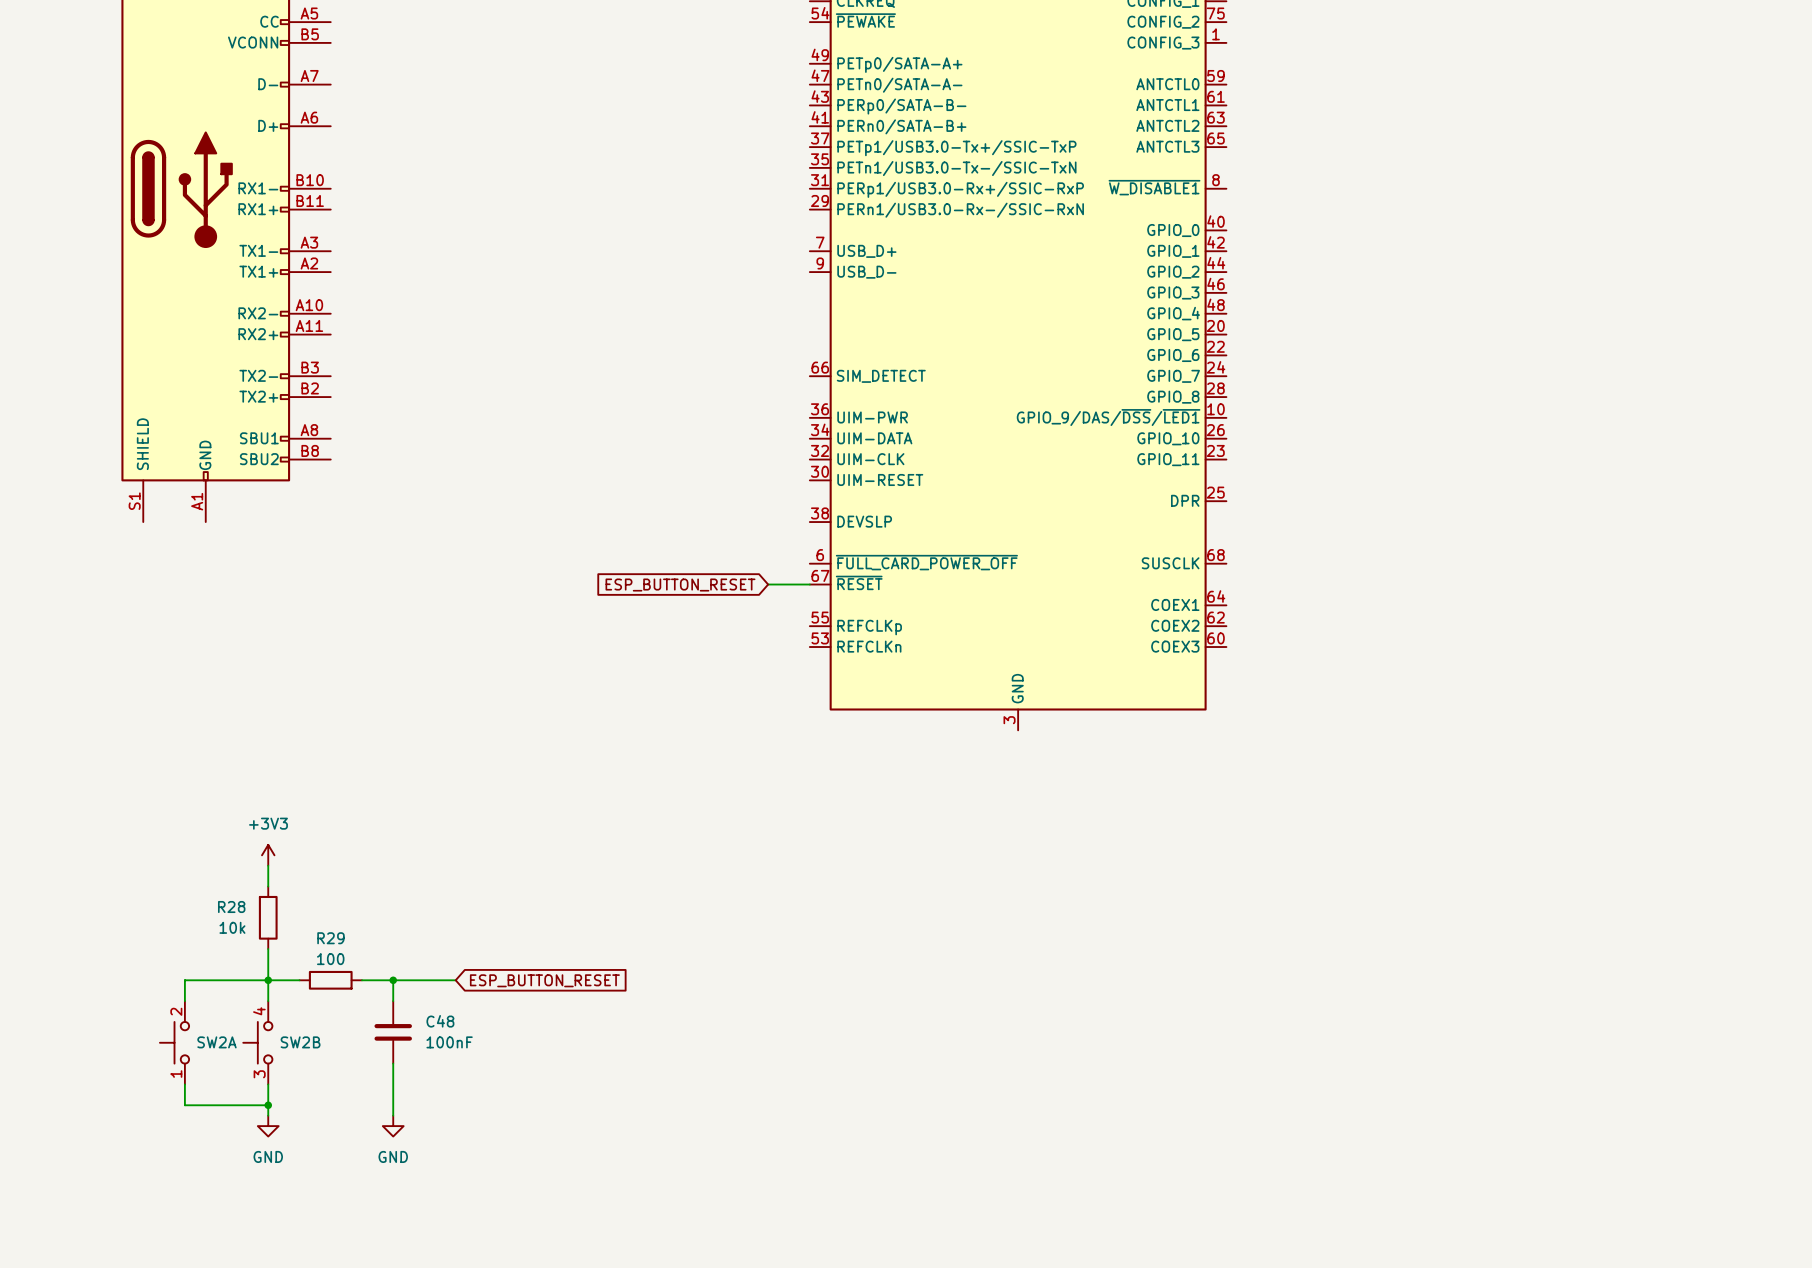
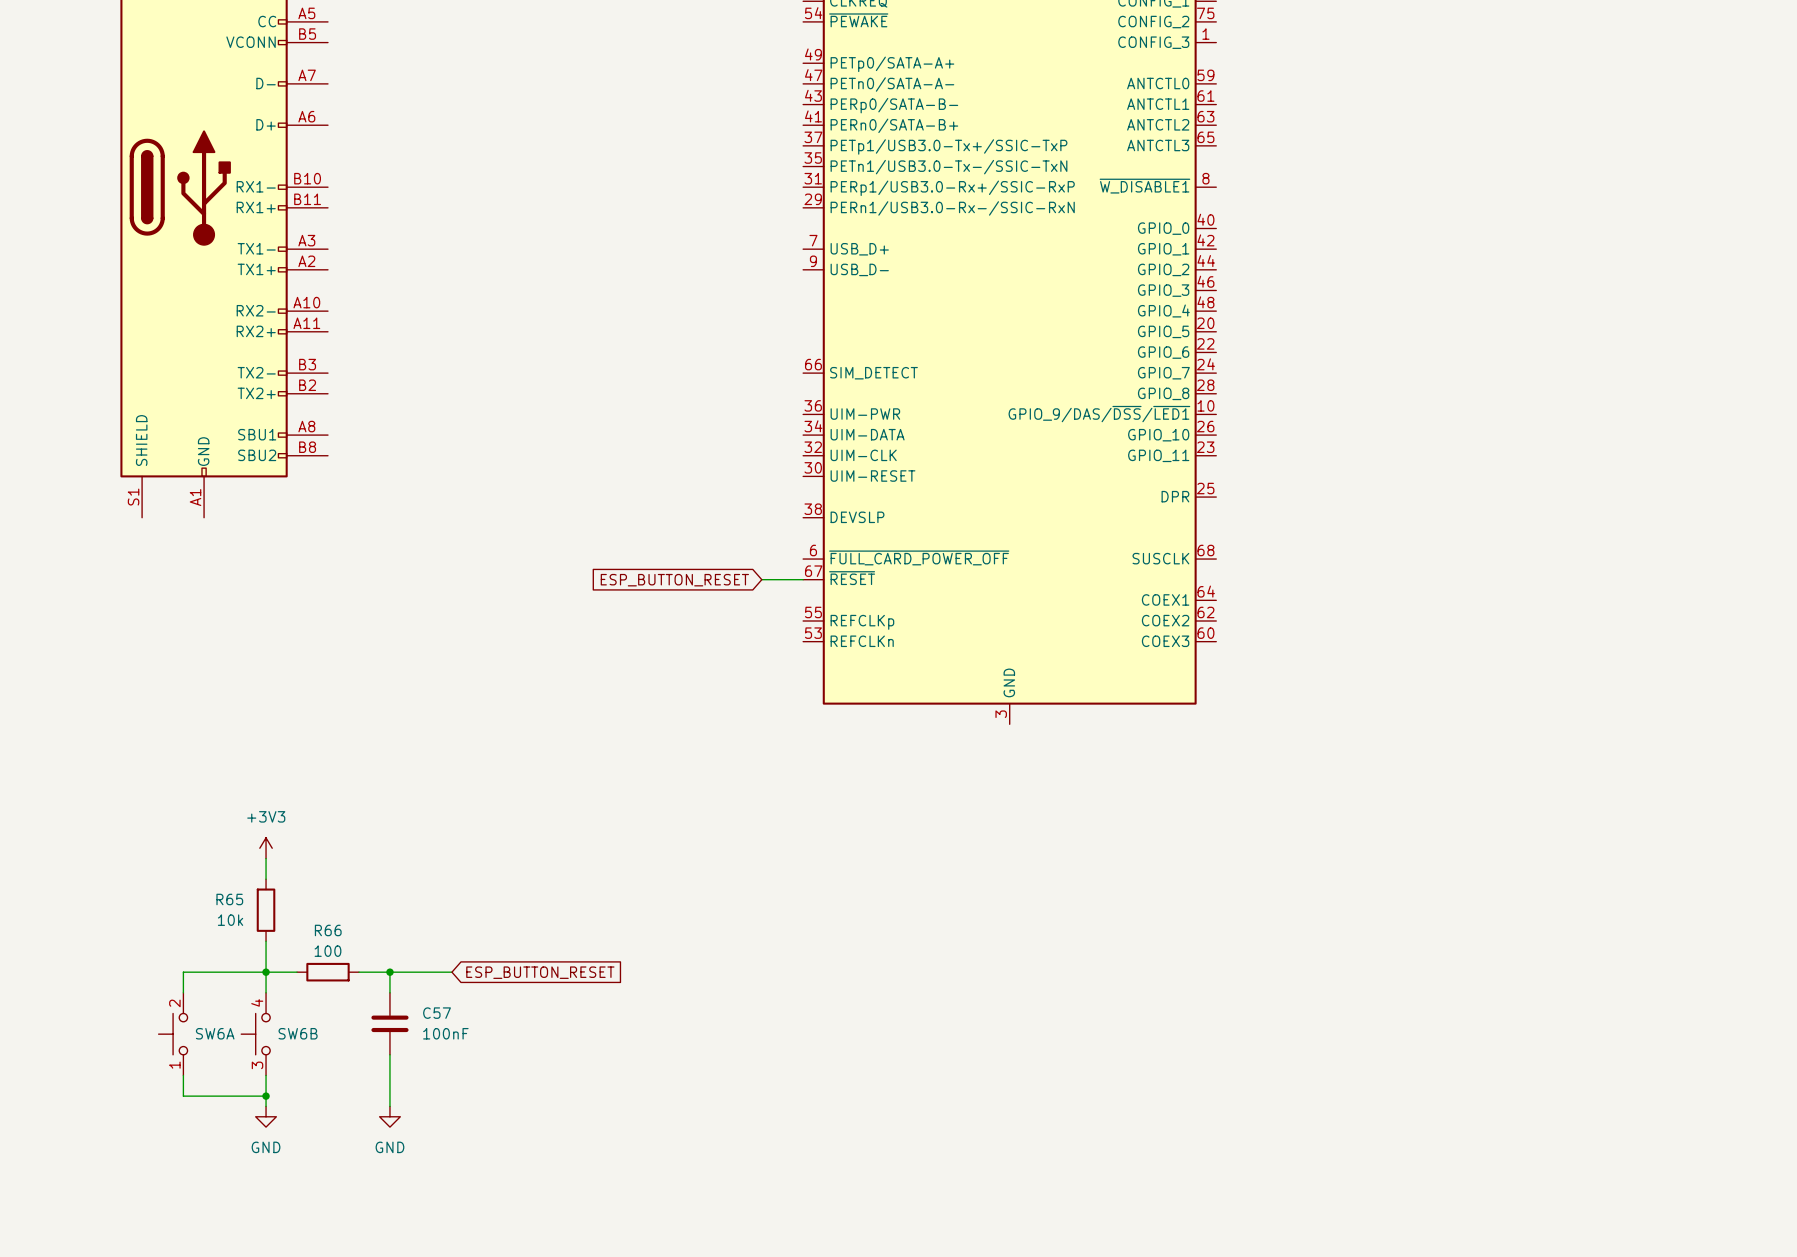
R28 name: R28 (231, 906) -> R65 (229, 899)
R29 name: R29 (330, 938) -> R66 (328, 930)
C48 name: C48 (440, 1021) -> C57 (437, 1013)
SW2A name: SW2A (216, 1042) -> SW6A (215, 1033)
SW2B name: SW2B (300, 1042) -> SW6B (298, 1033)

